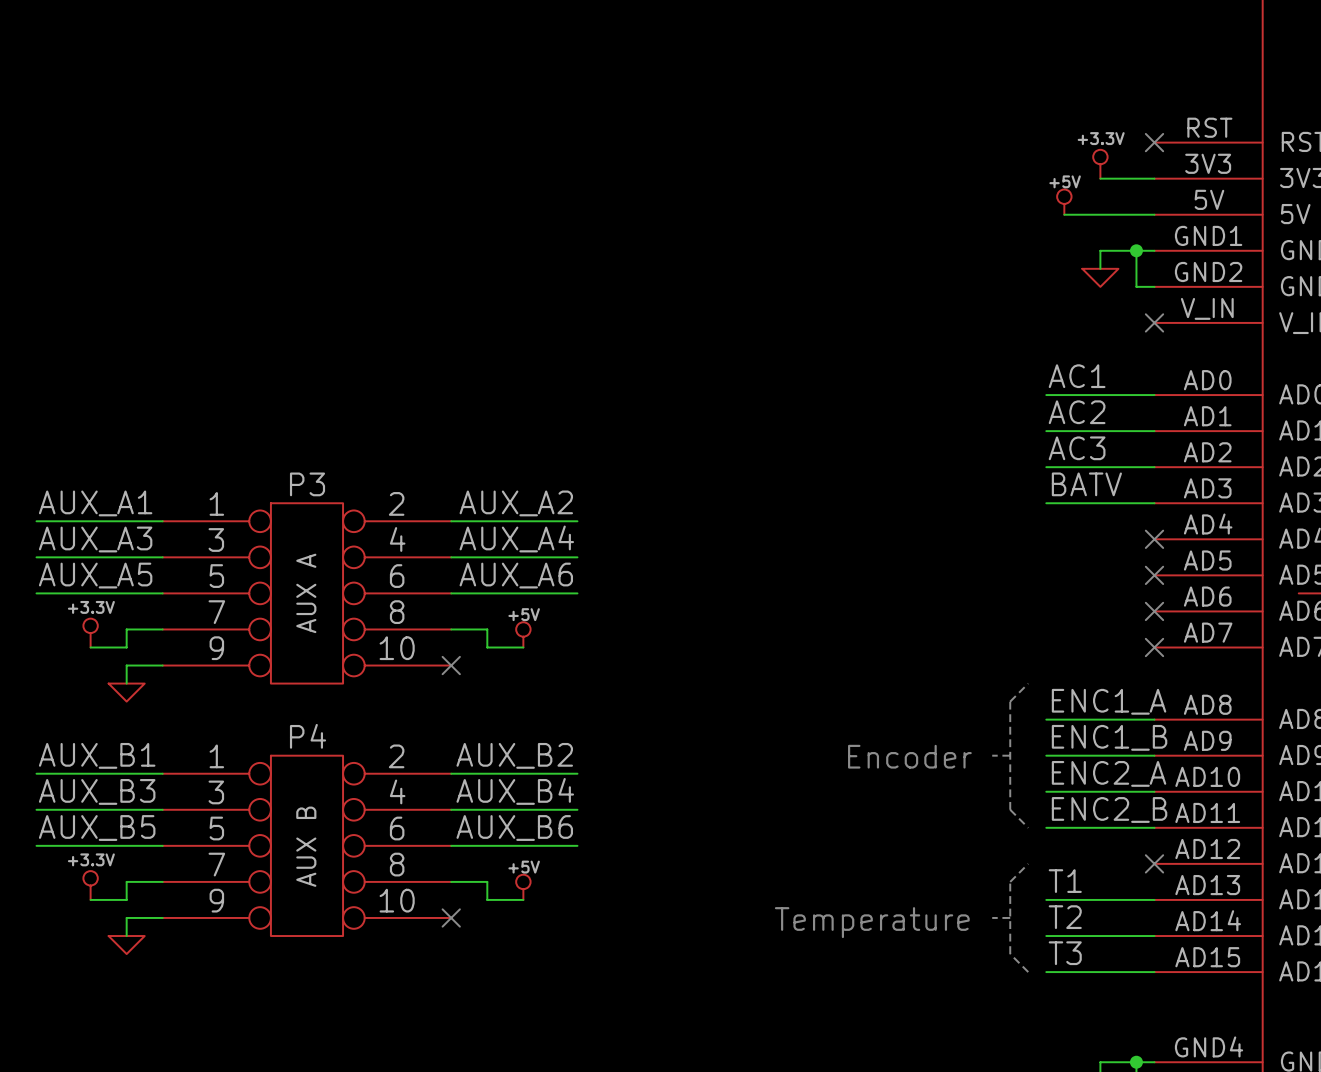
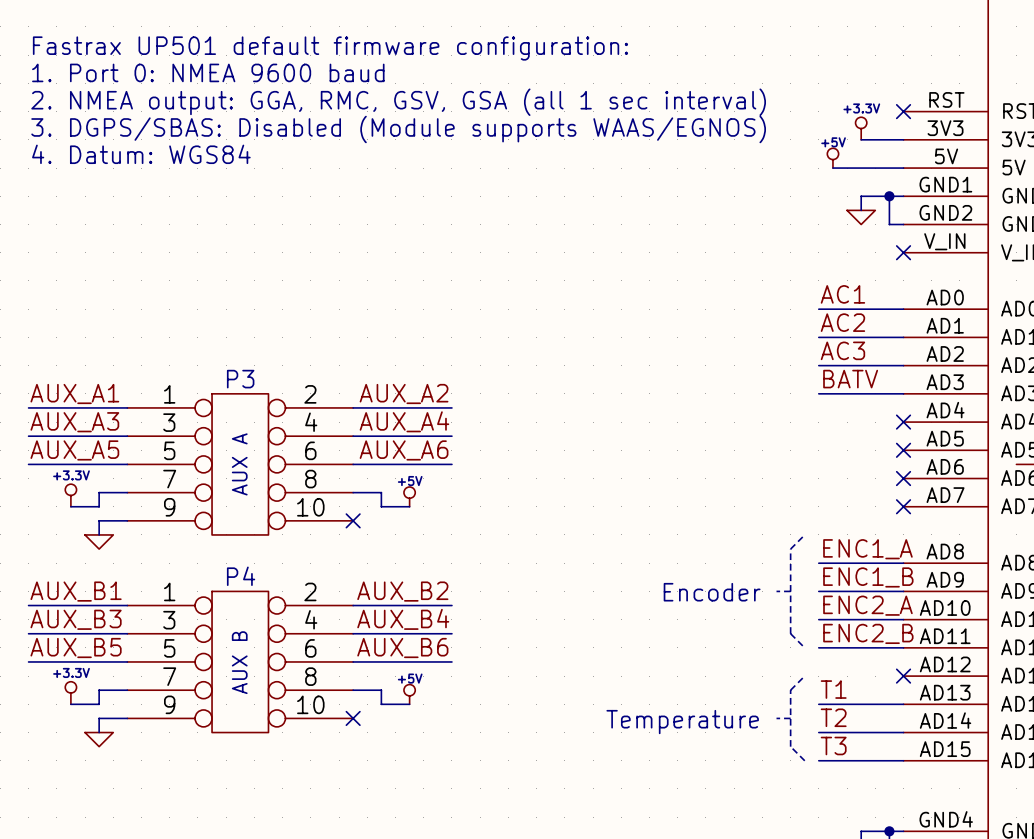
text: none -> Fastrax UP501 default firmware configuration: (330, 48)
text: none -> 1. Port 0: NMEA 9600 baud (208, 72)
text: none -> 2. NMEA output: GGA, RMC, GSV, GSA (all 1 sec interval) (398, 102)
text: none -> 3. DGPS/SBAS: Disabled (Module supports WAAS/EGNOS) (398, 129)
text: none -> 4. Datum: WGS84 (141, 154)

